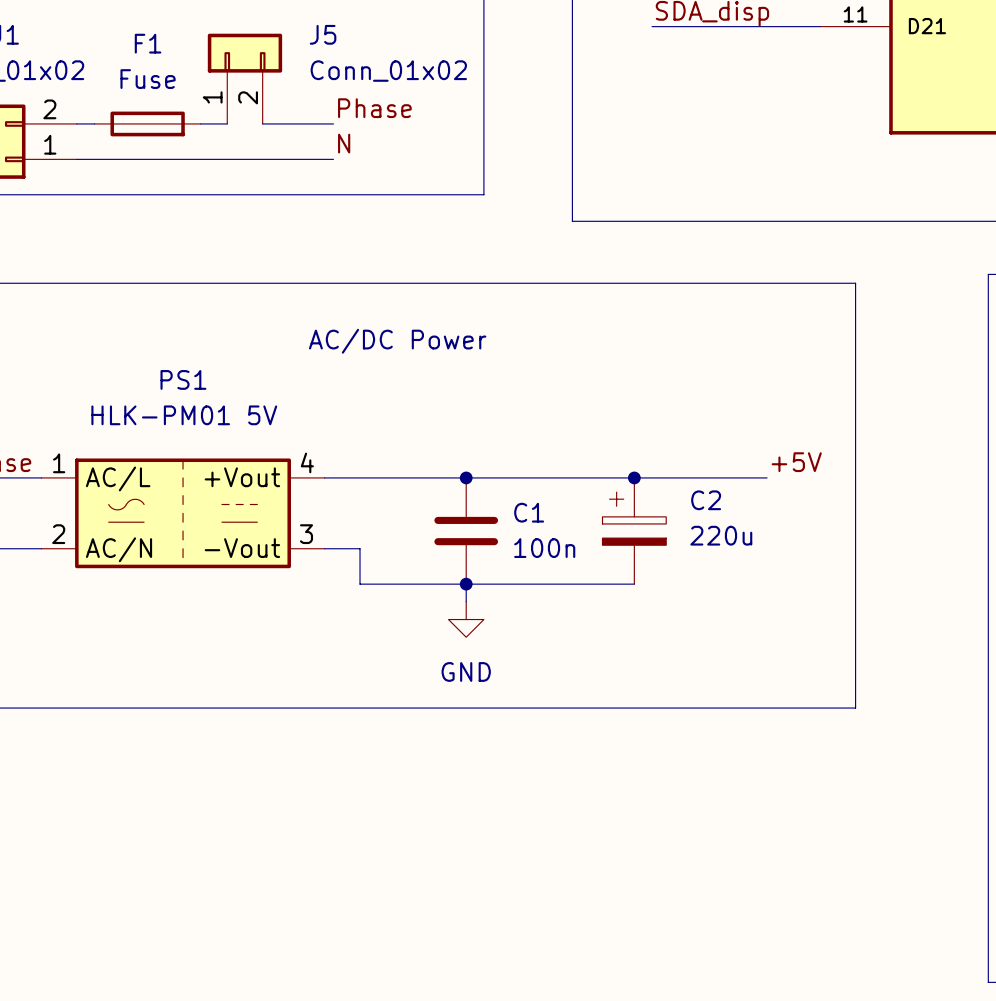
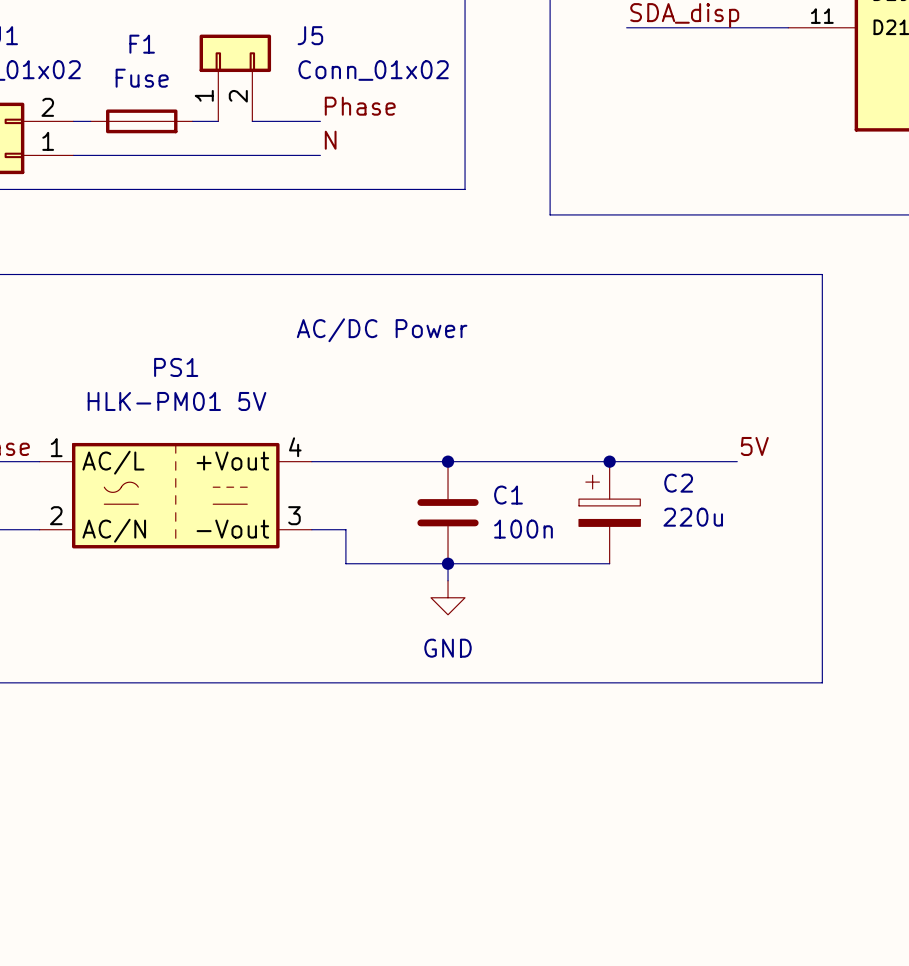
label: +5V (796, 462) -> 5V (754, 446)

